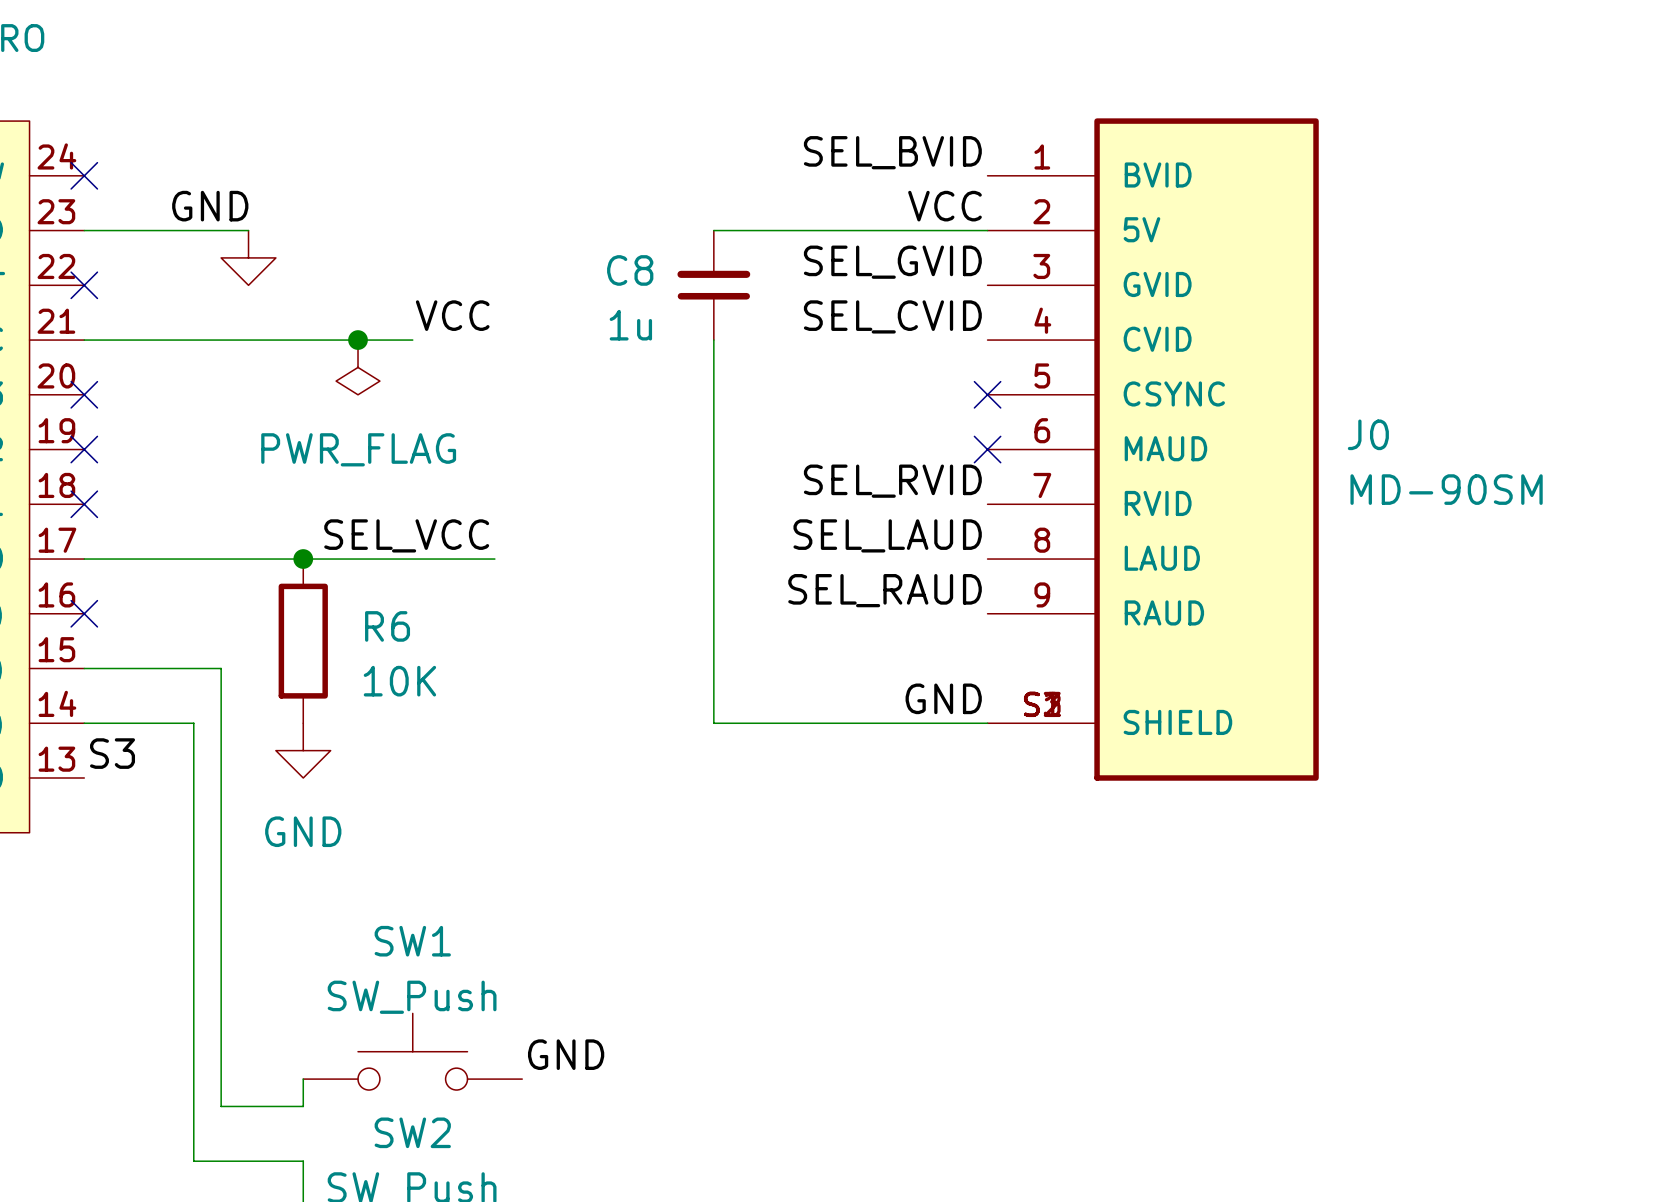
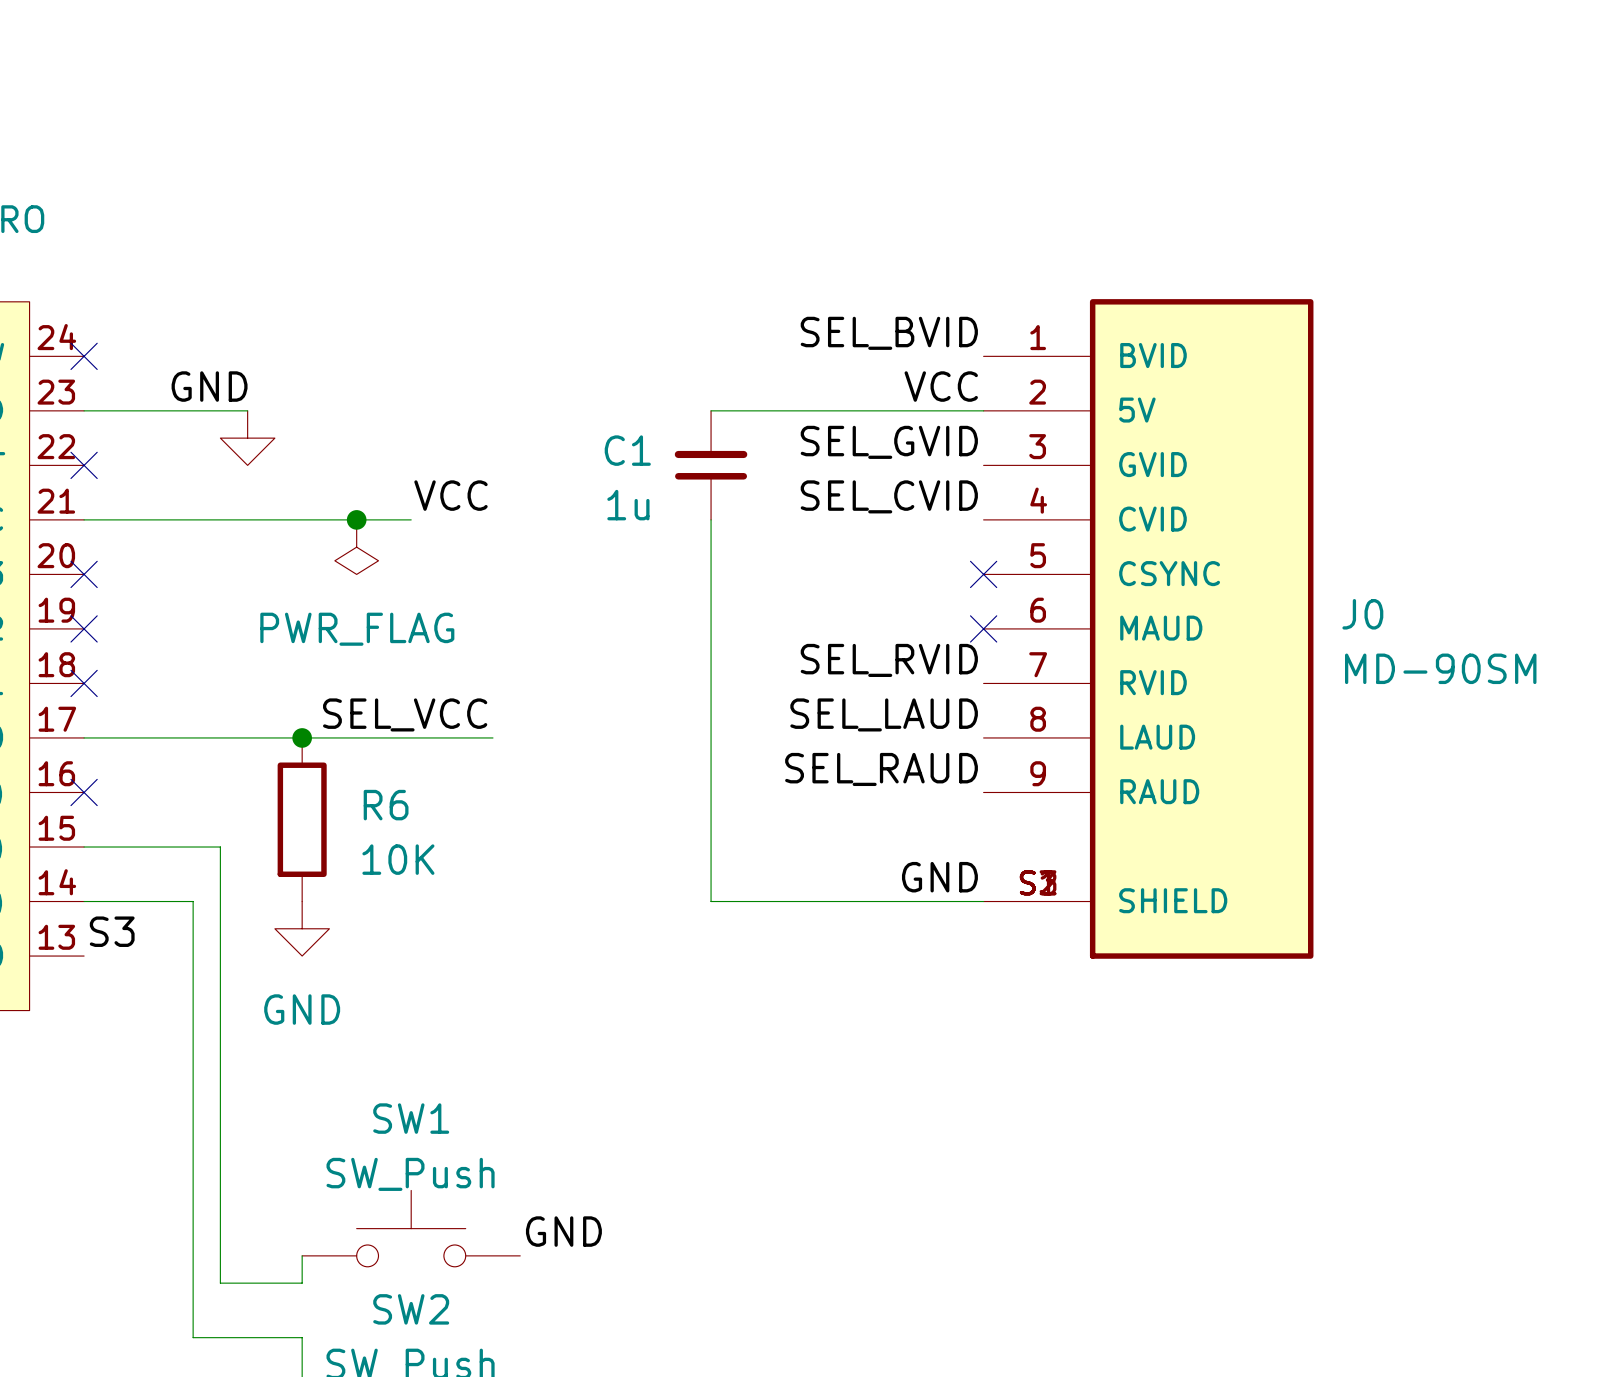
C8 name: C8 (630, 270) -> C1 (627, 450)

